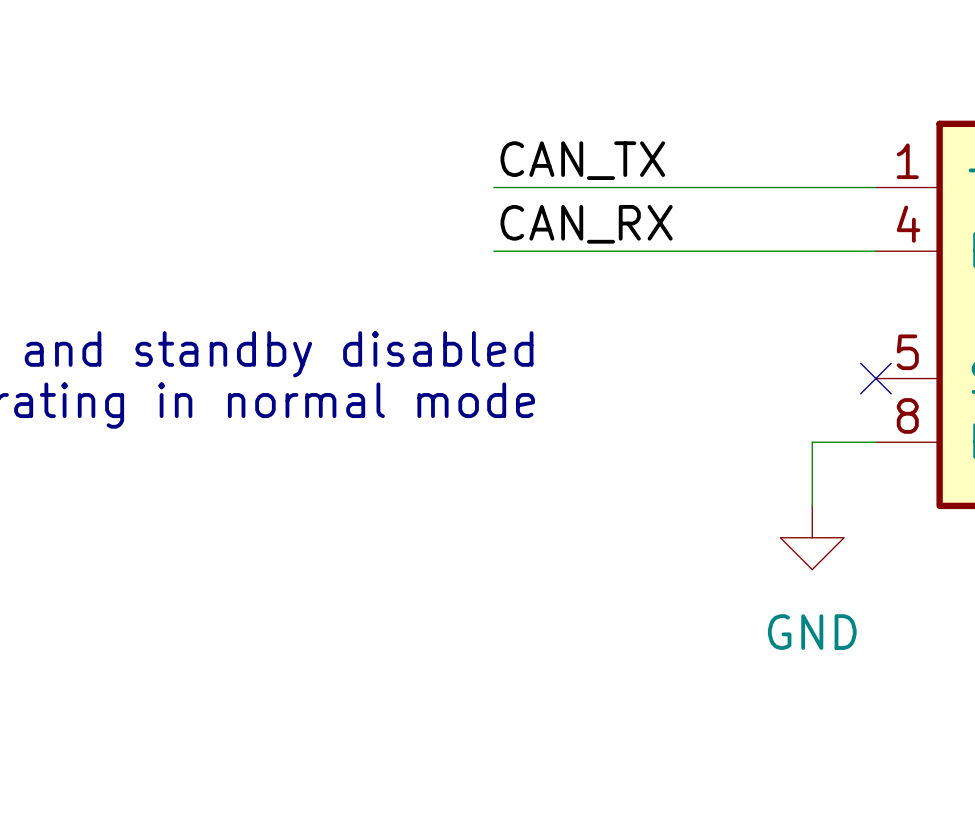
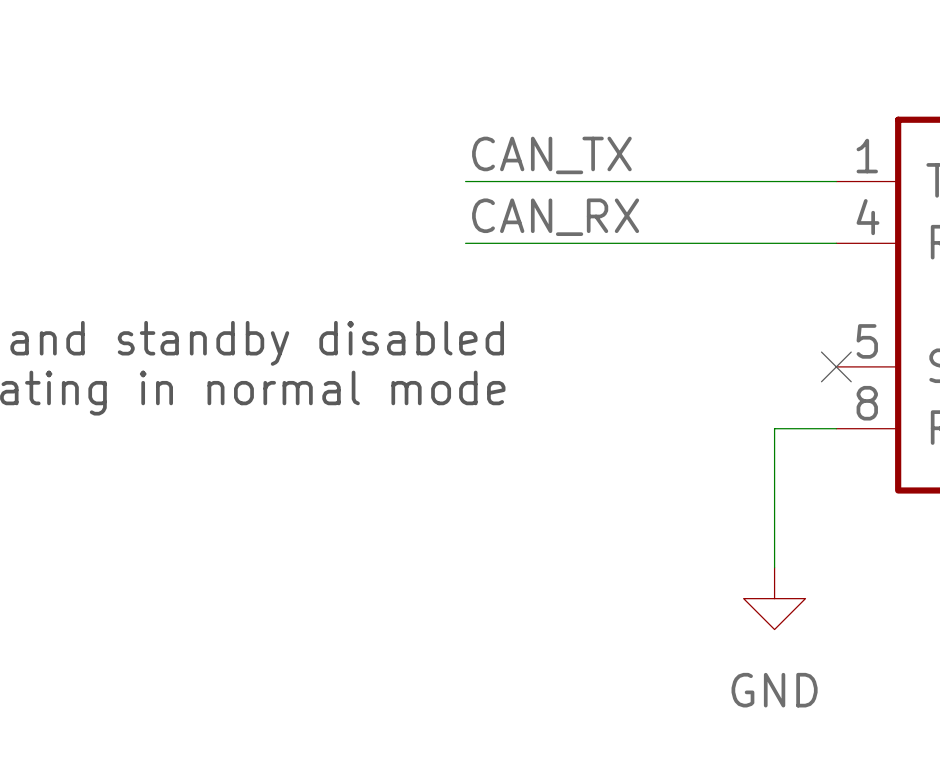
wire: none -> (774, 490) (774, 567)
power symbol position: GND (812, 537) -> GND (774, 598)

